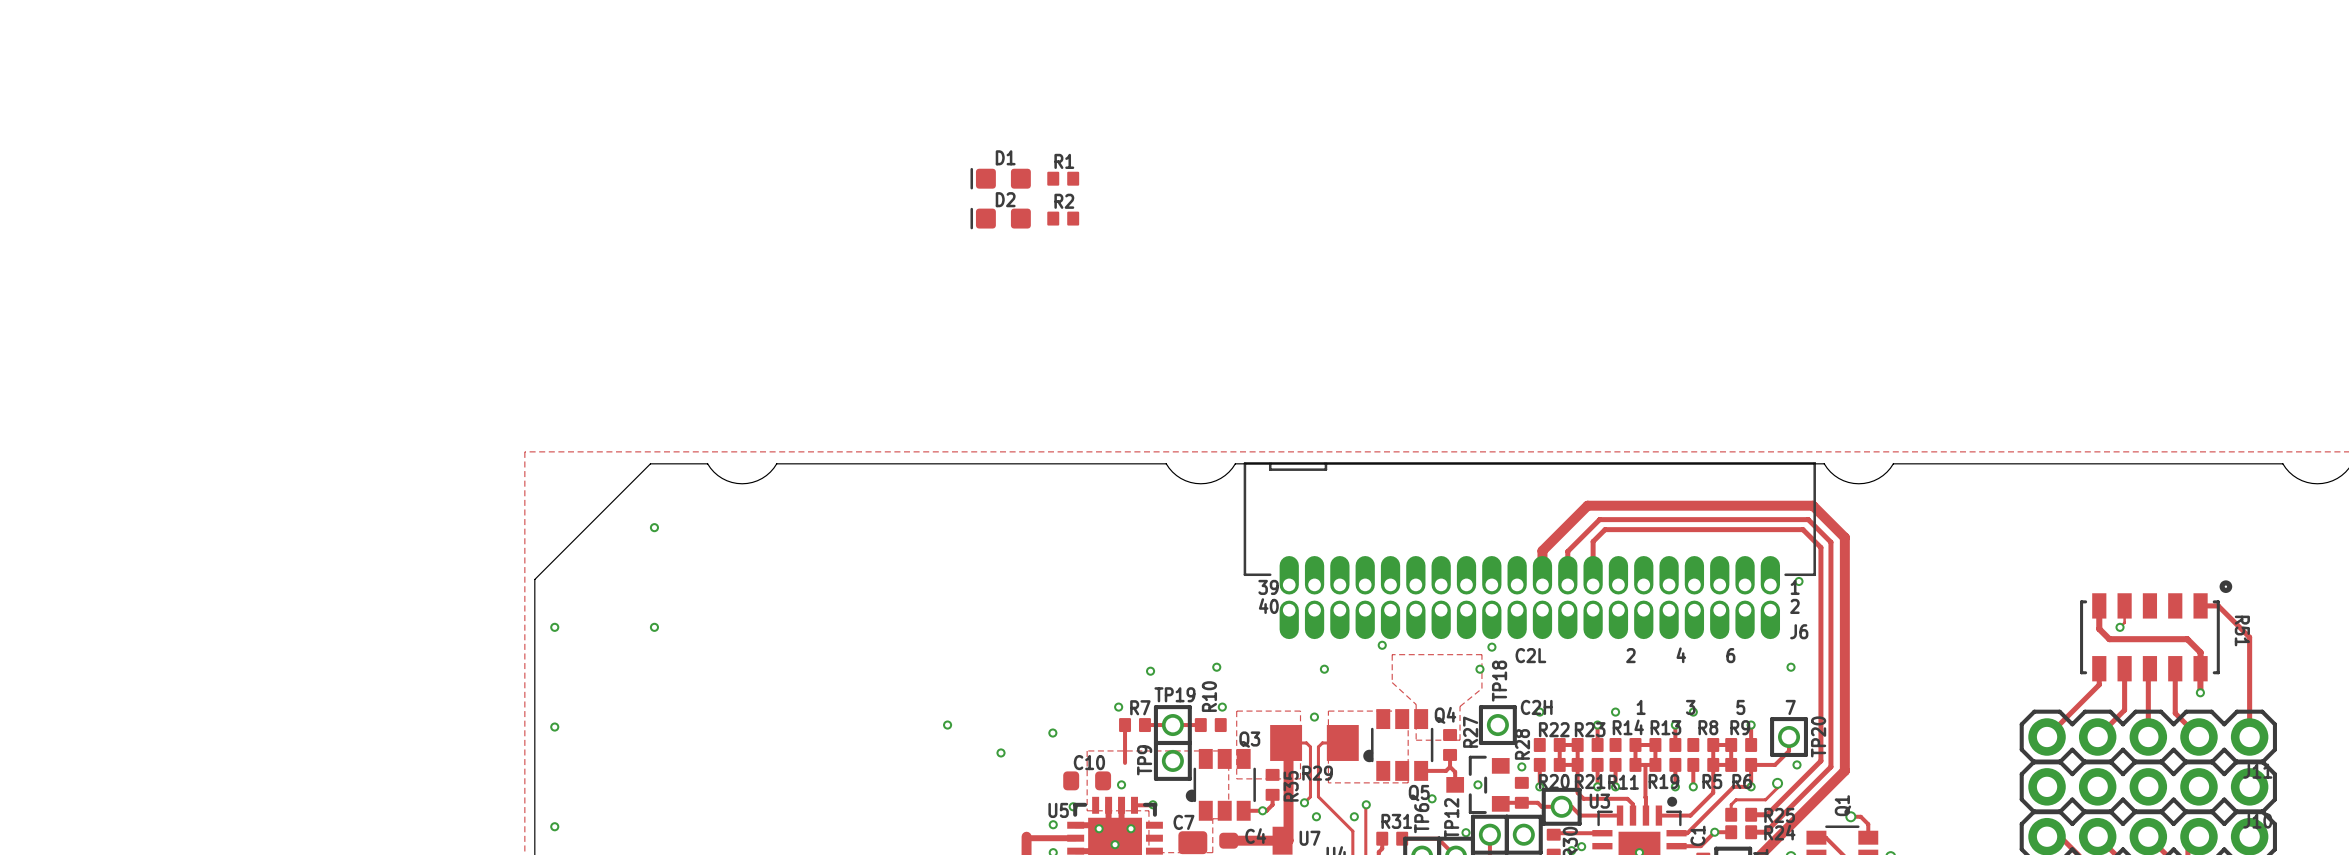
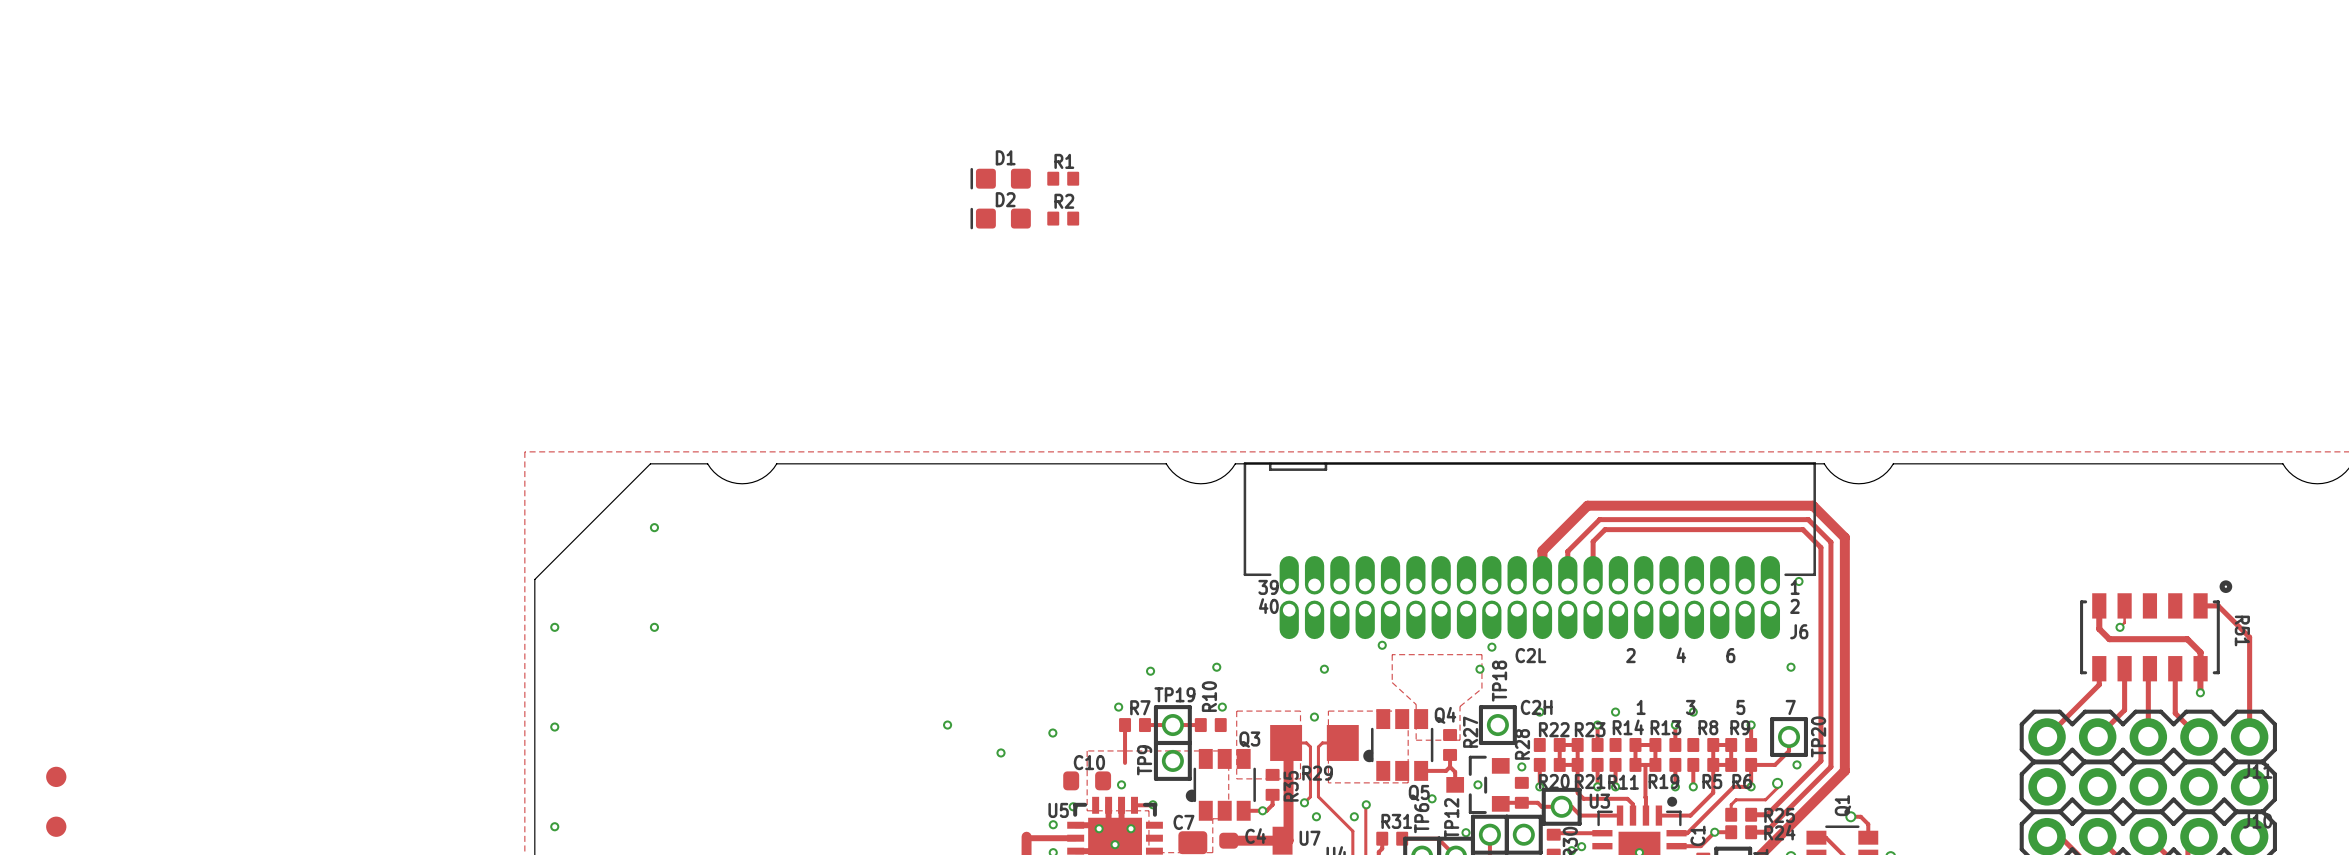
part: none -> (56, 776)
part: none -> (56, 826)

